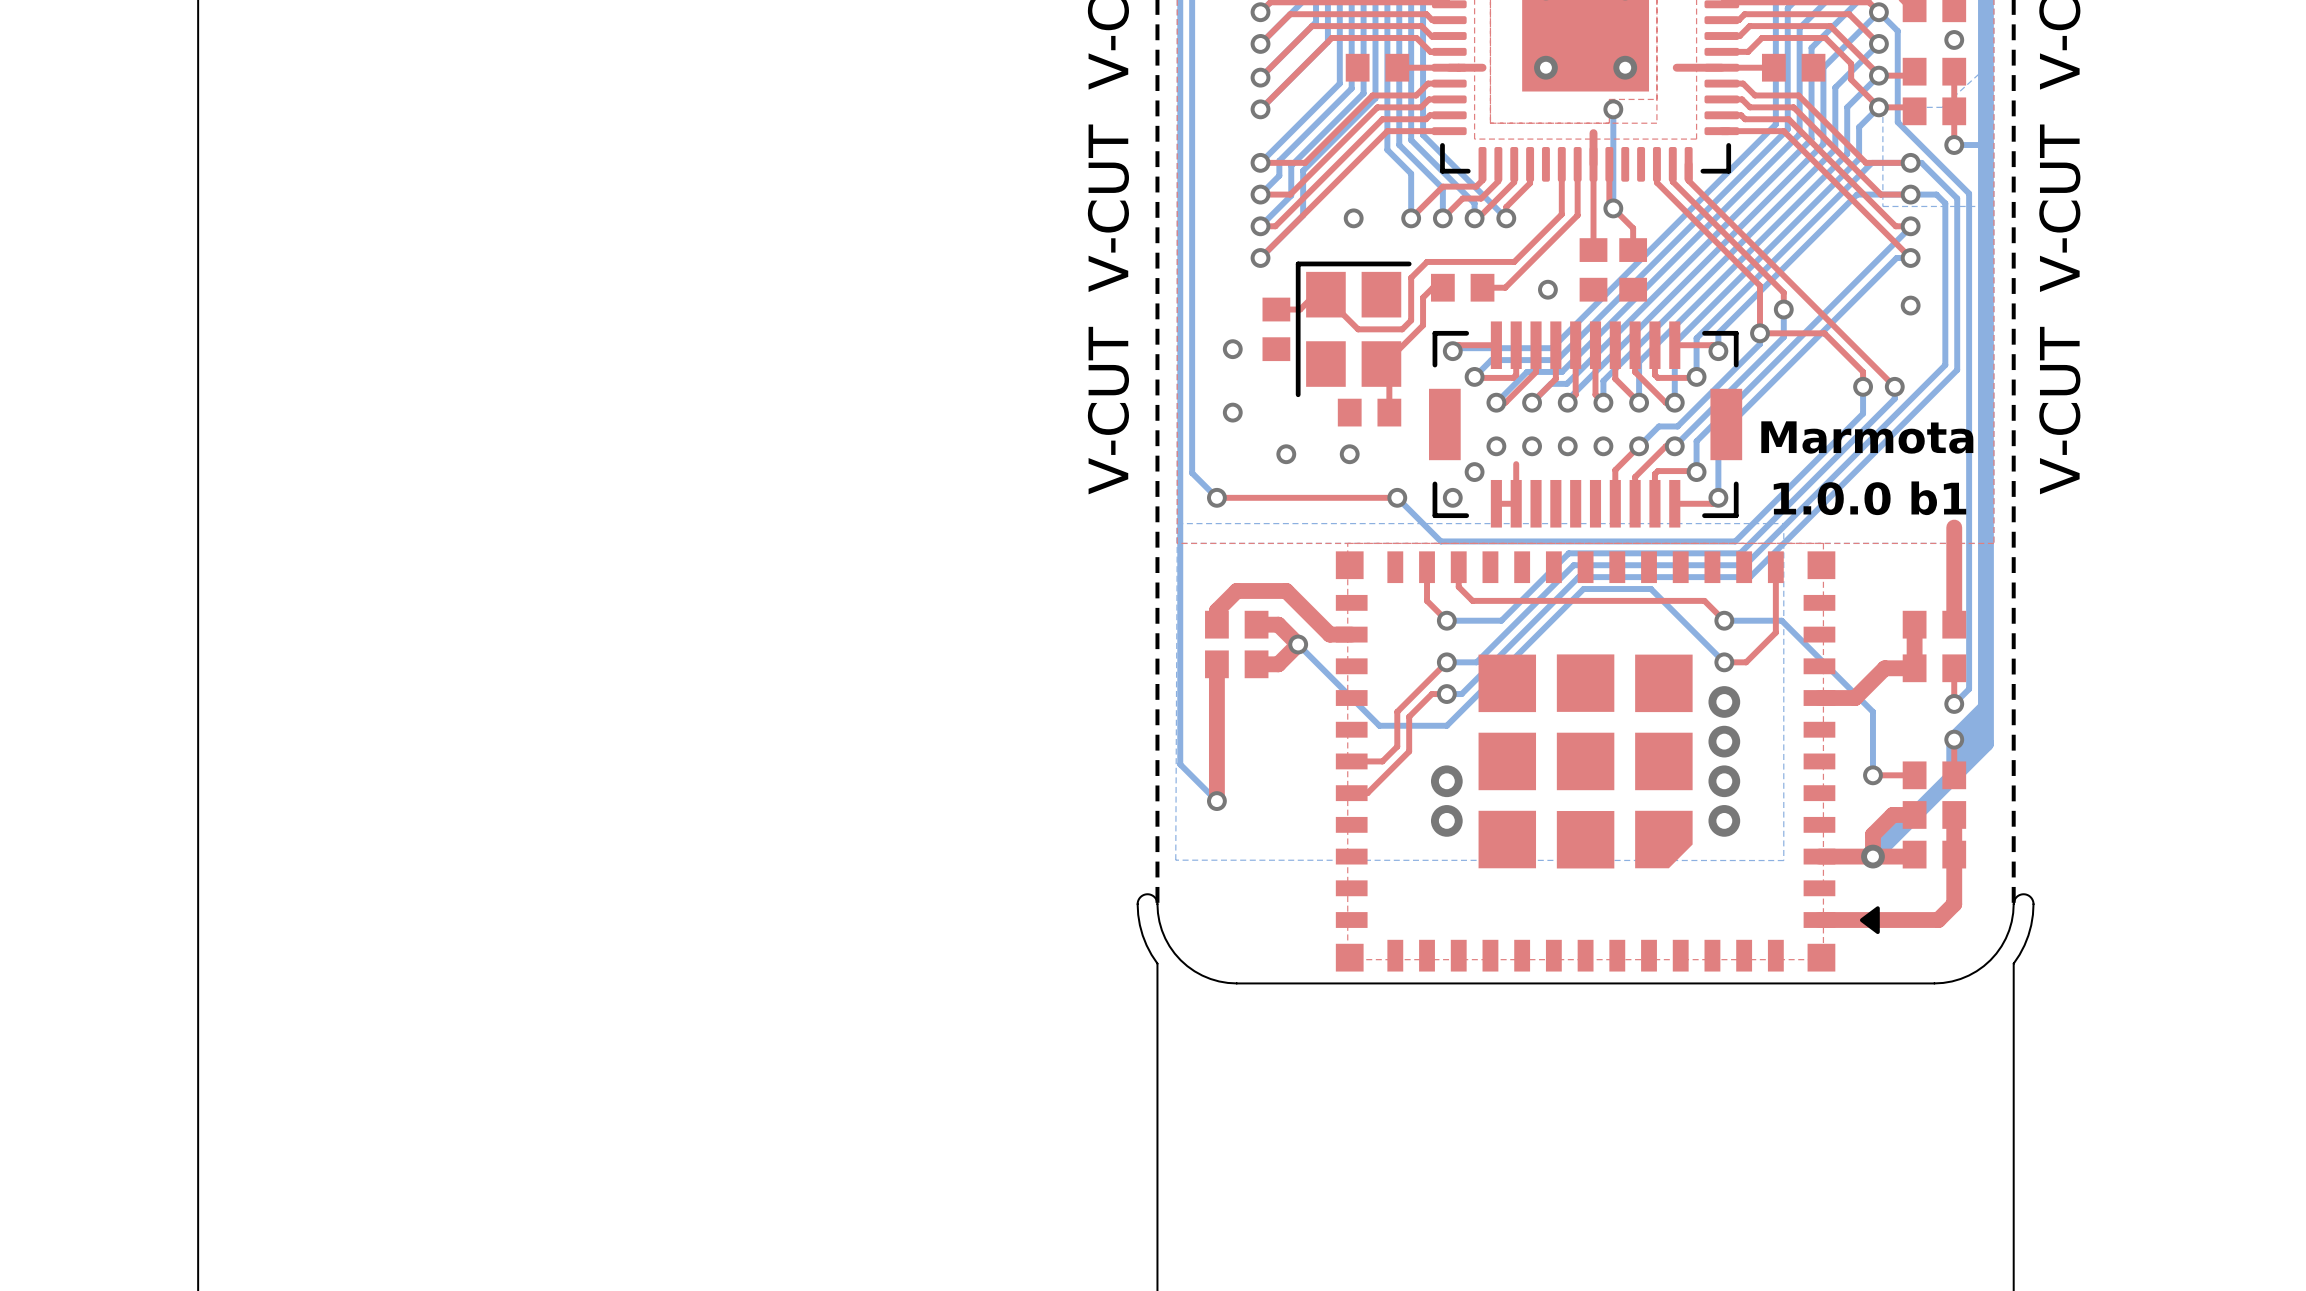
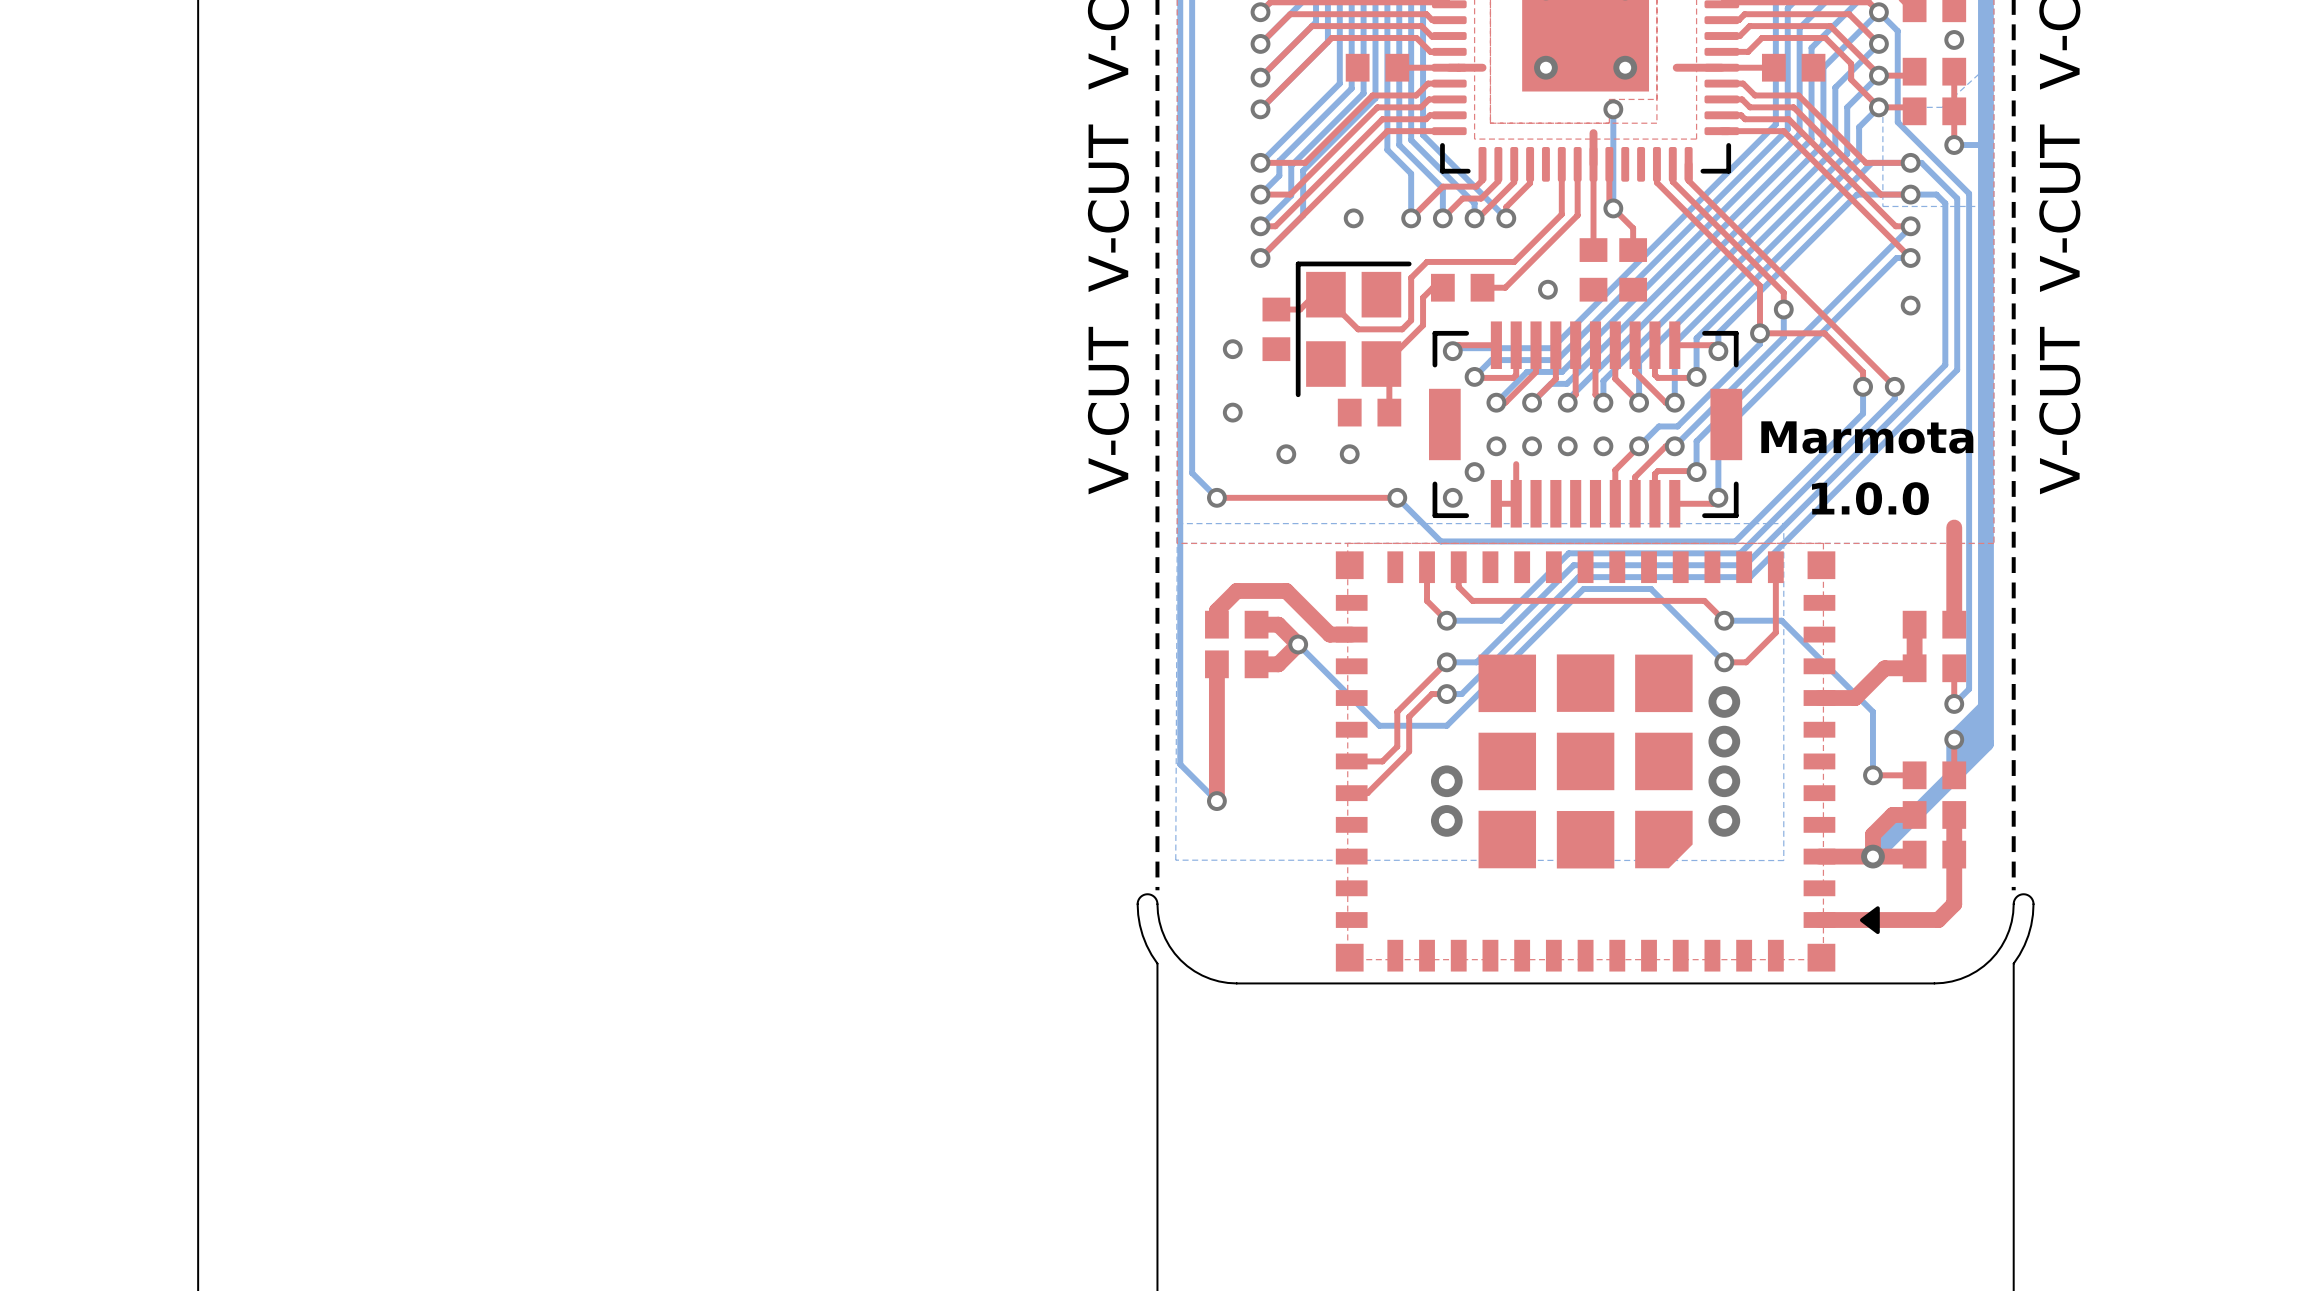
text: 1.0.0 b1 (1869, 498) -> 1.0.0 (1870, 498)
line: (1157, 890) (1157, 904) -> none
line: (2013, 890) (2013, 904) -> none

